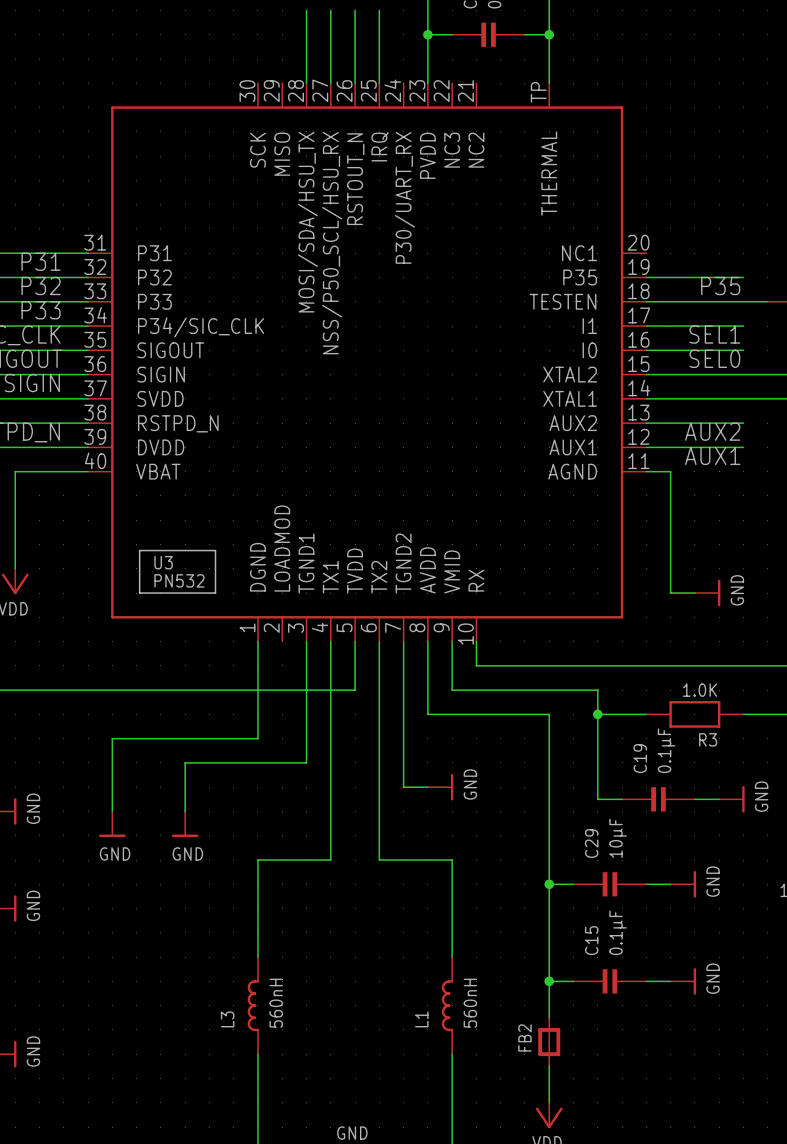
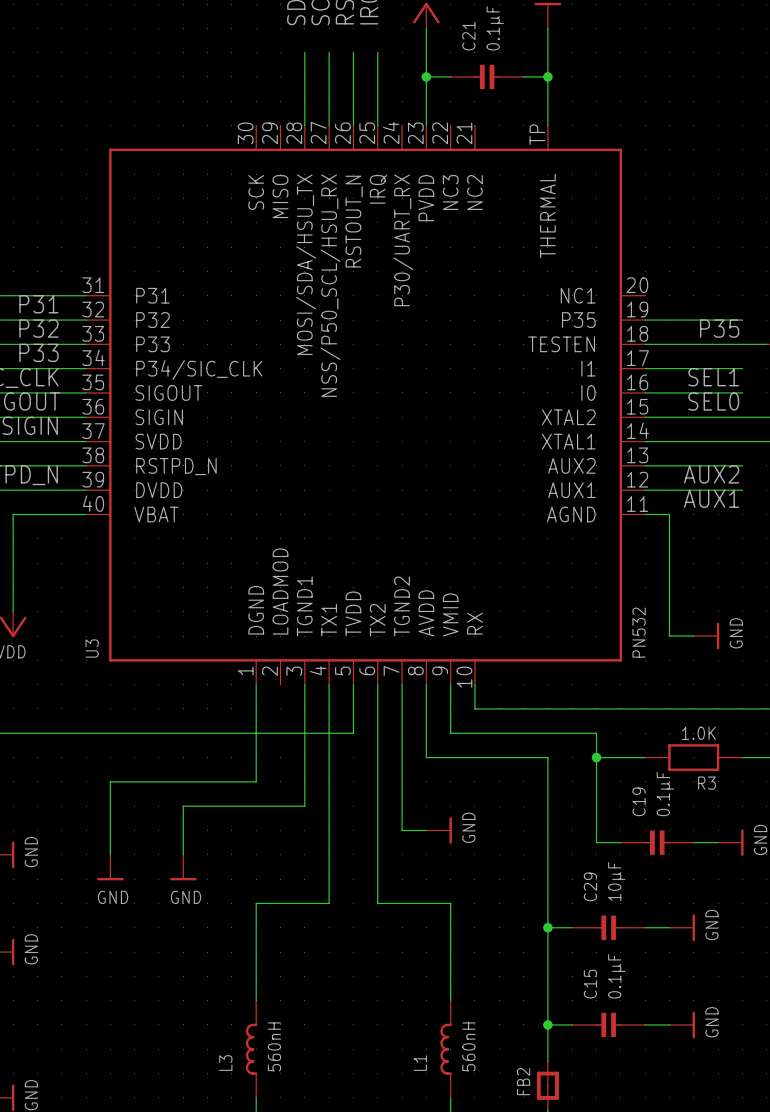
line: (139, 550) (215, 550) (215, 593) (139, 593) (139, 550) -> none
U3 name rotation: 0° (163, 562) -> 90° counterclockwise (92, 648)
U3 name position: U3 (163, 562) -> U3 (92, 648)
U3 value rotation: 0° (179, 580) -> 90° counterclockwise (639, 632)
U3 value position: PN532 (179, 580) -> PN532 (639, 632)

